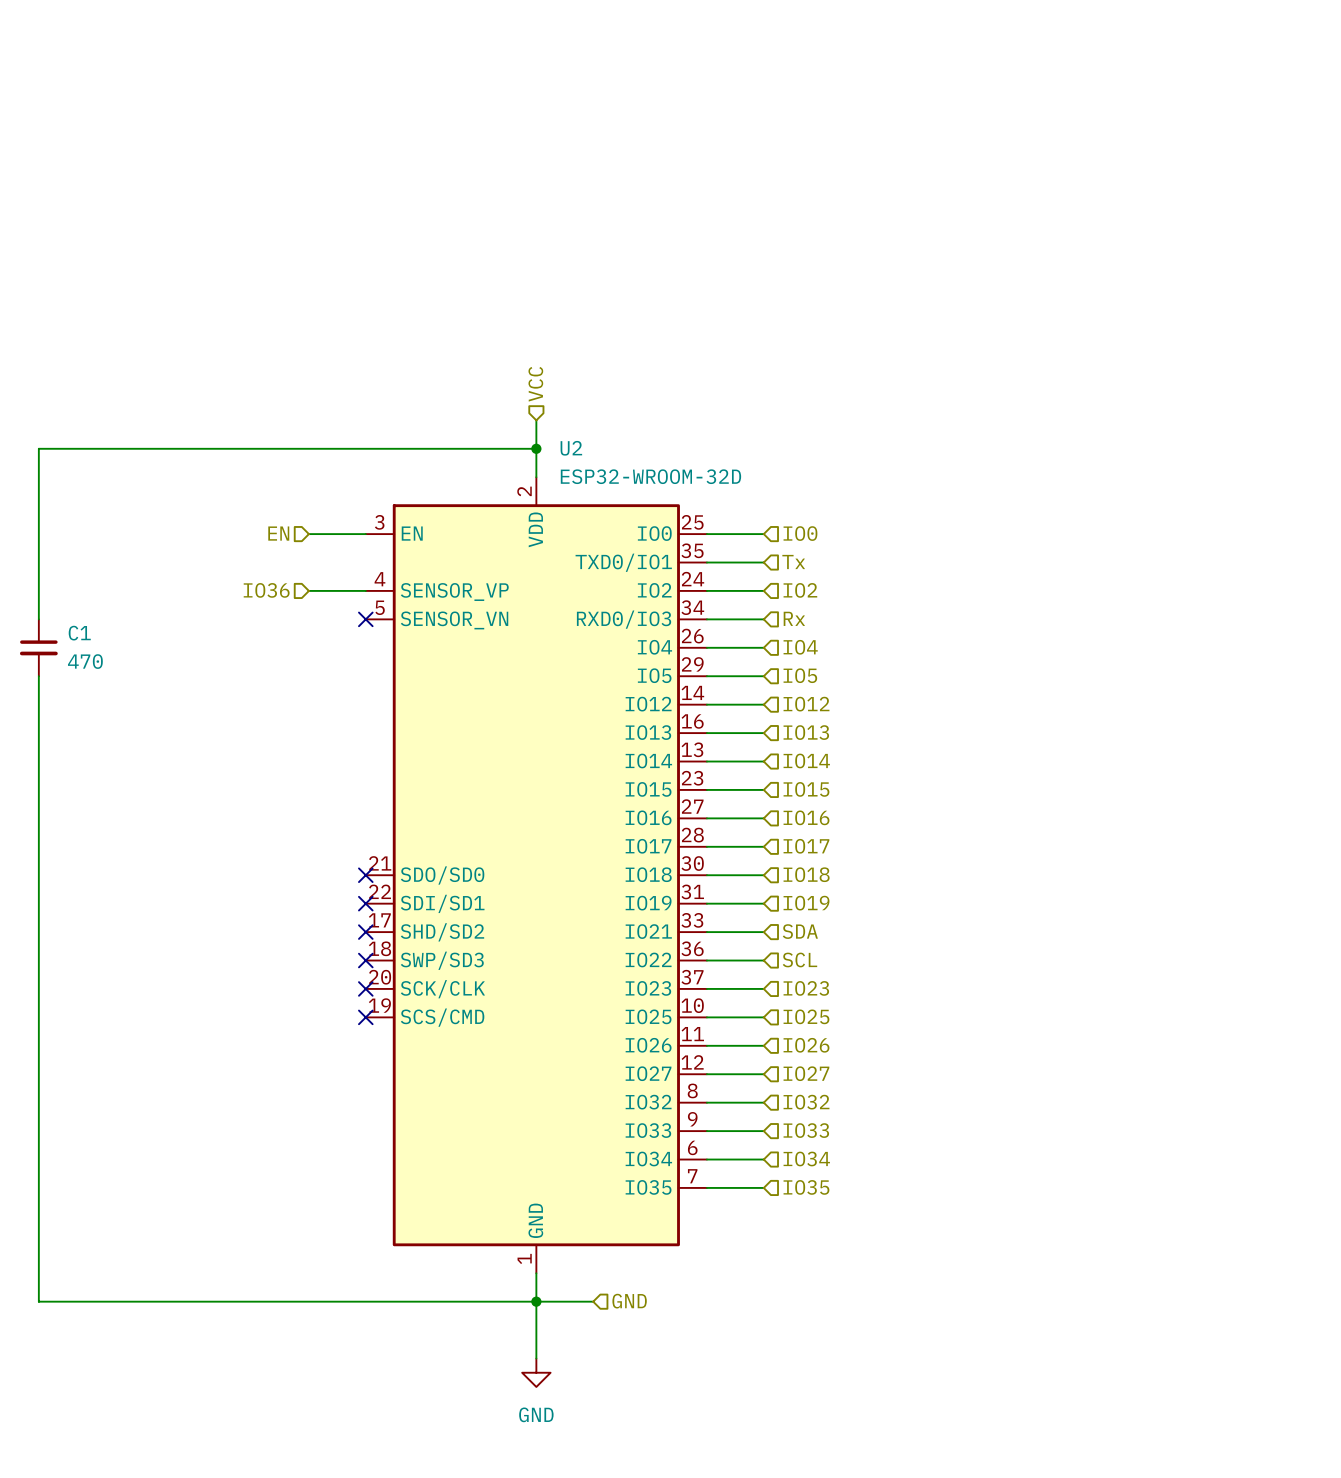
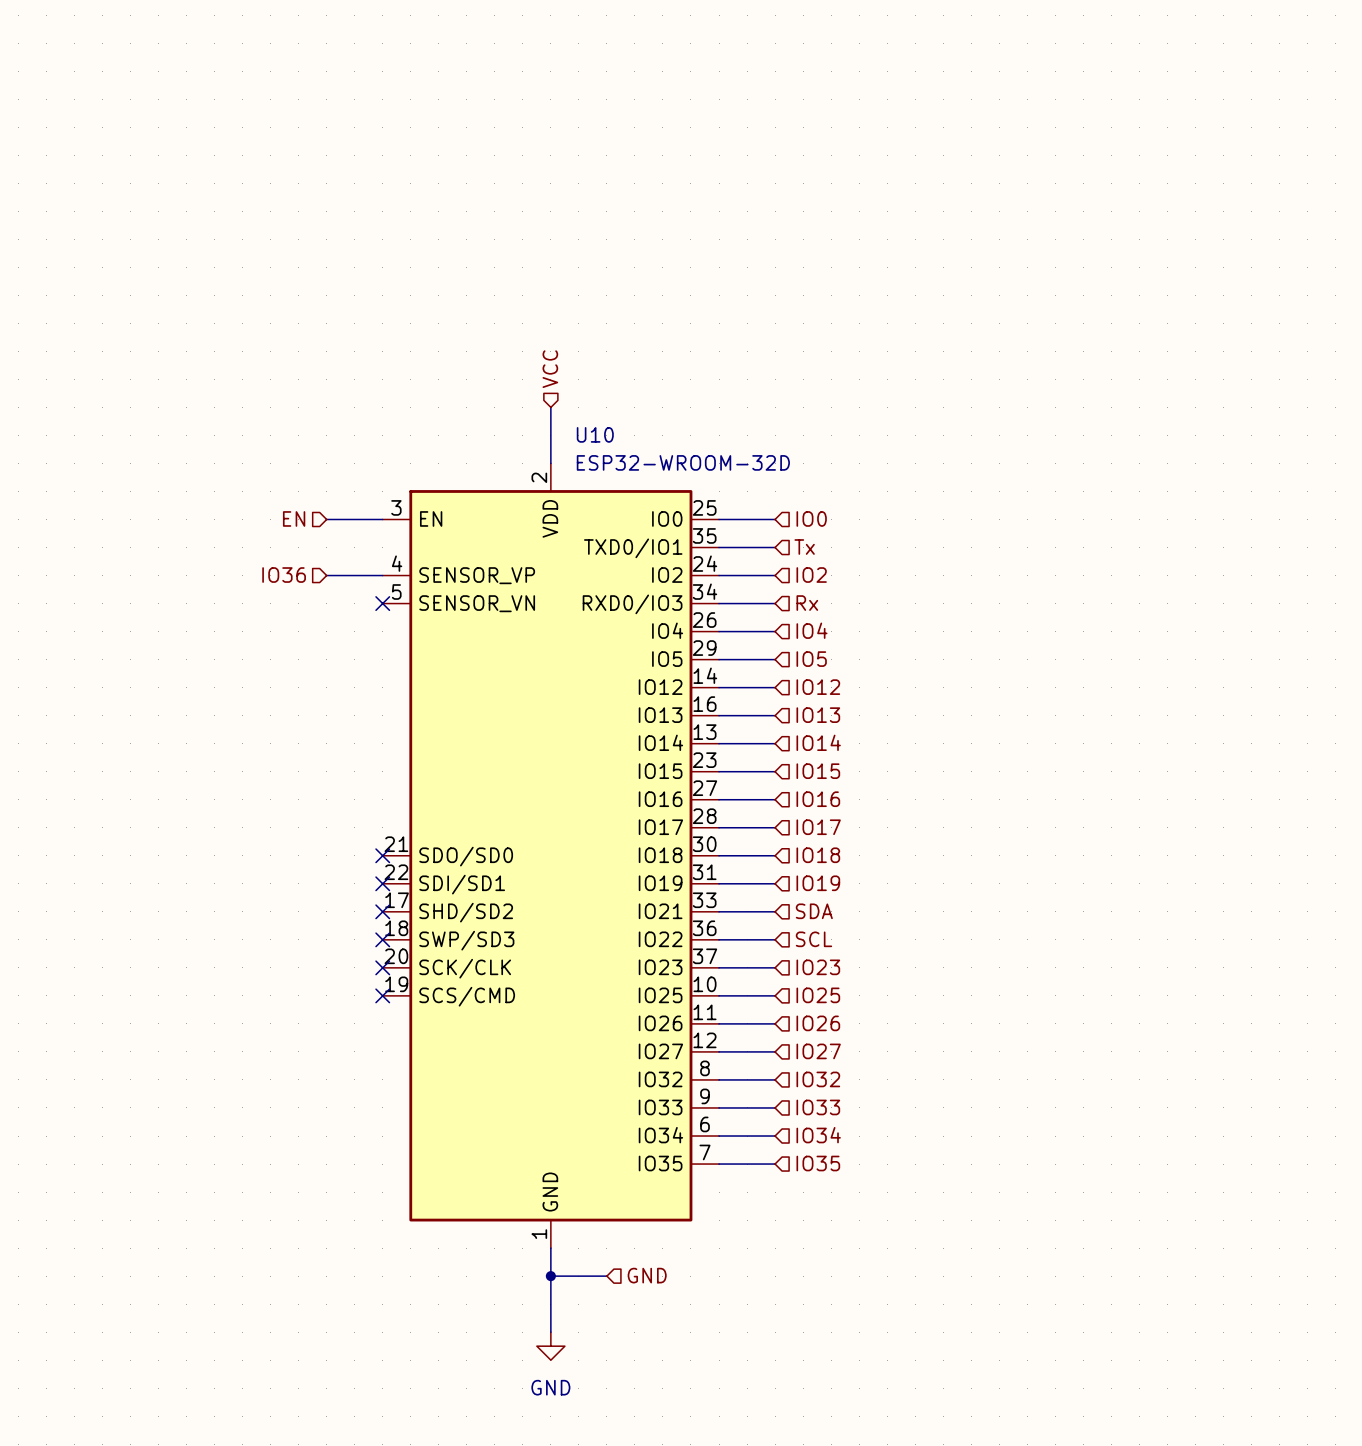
wire: (536, 448) (38, 448) (38, 619) -> none
junction: (536, 448) -> none
U2 name: U2 (571, 448) -> U10 (595, 434)
C1: 470 (38, 647) -> none
wire: (38, 676) (38, 1301) (536, 1301) -> none

